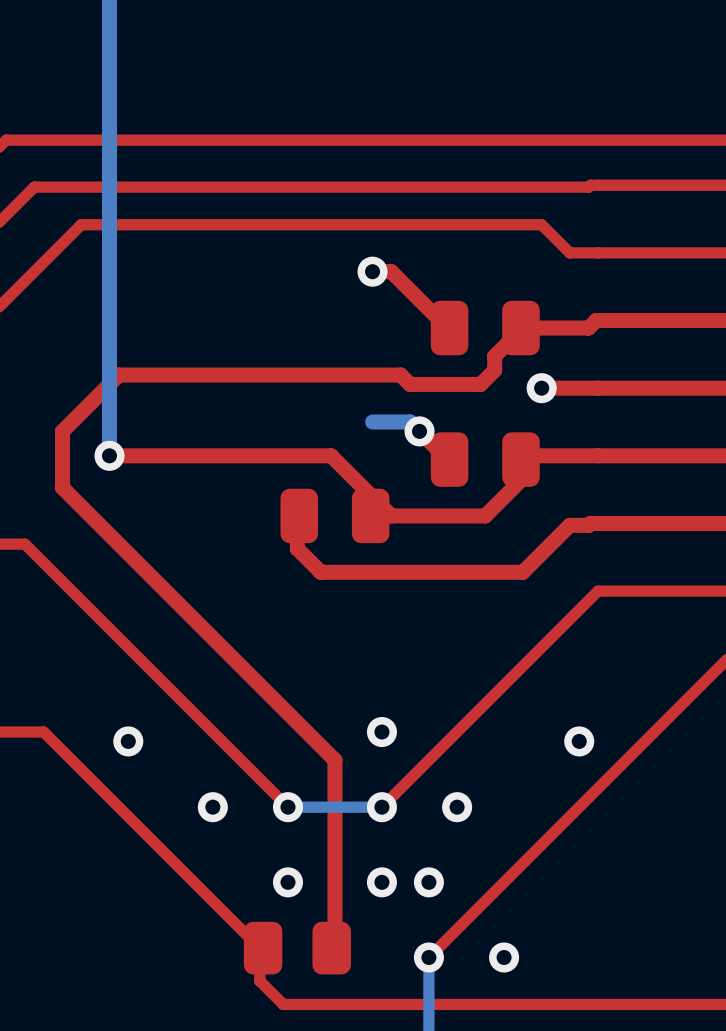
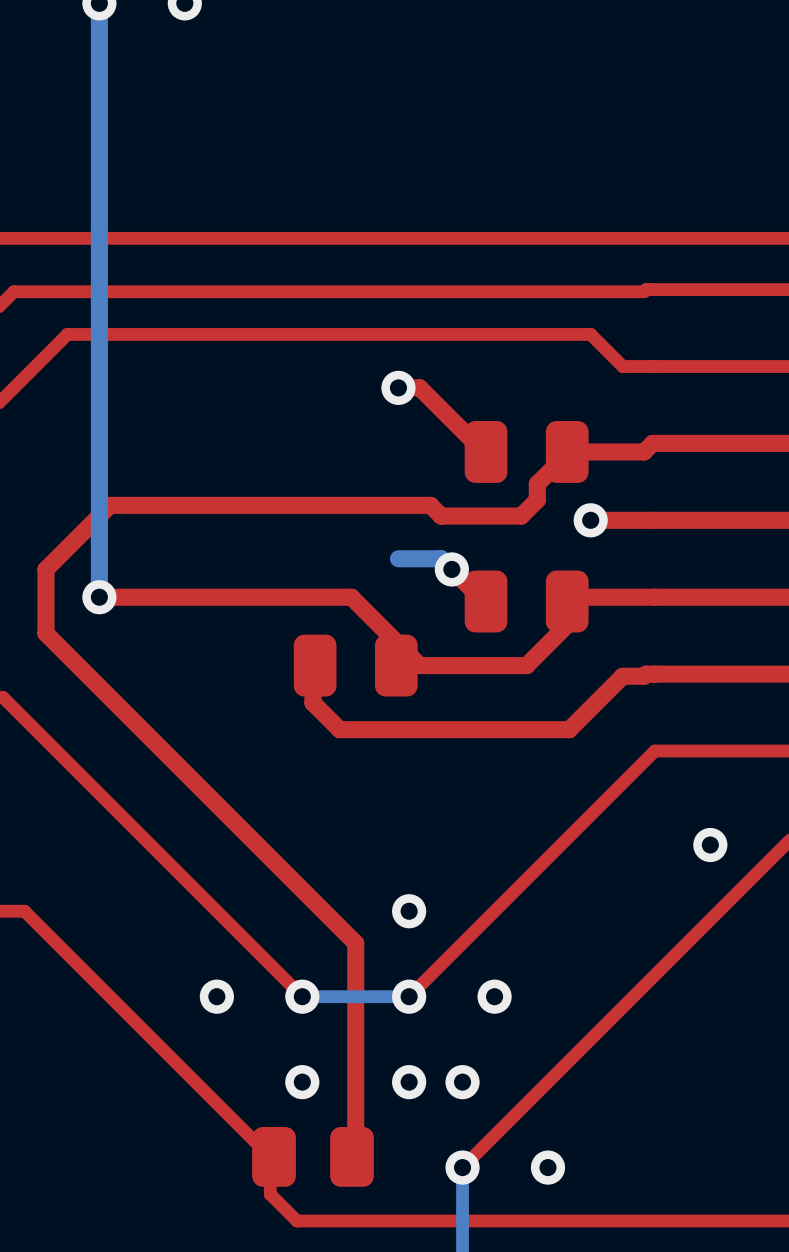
via: (128, 741) -> none
via position: (579, 741) -> (710, 845)

